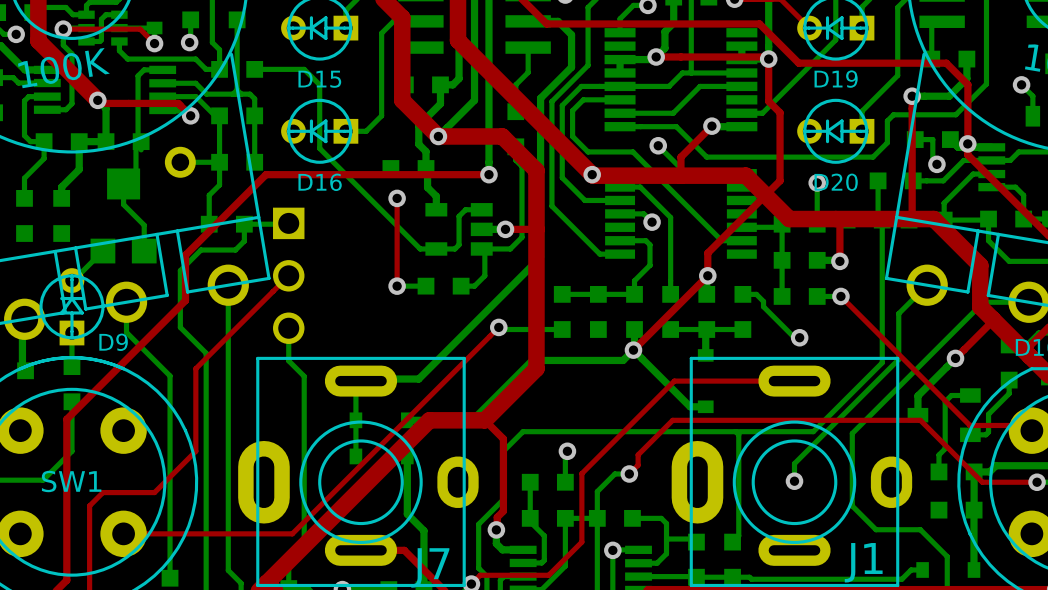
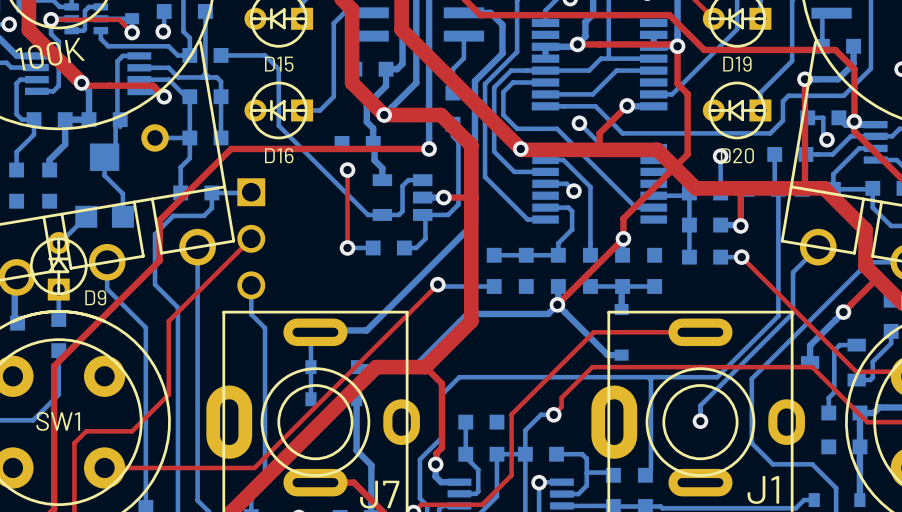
bottom track: (742, 294) (756, 294) (763, 301) (763, 306) (794, 337) (799, 337) -> none
via: (799, 337) -> none
bottom track: (567, 451) (565, 453) (565, 482) -> none
via: (567, 451) -> none

